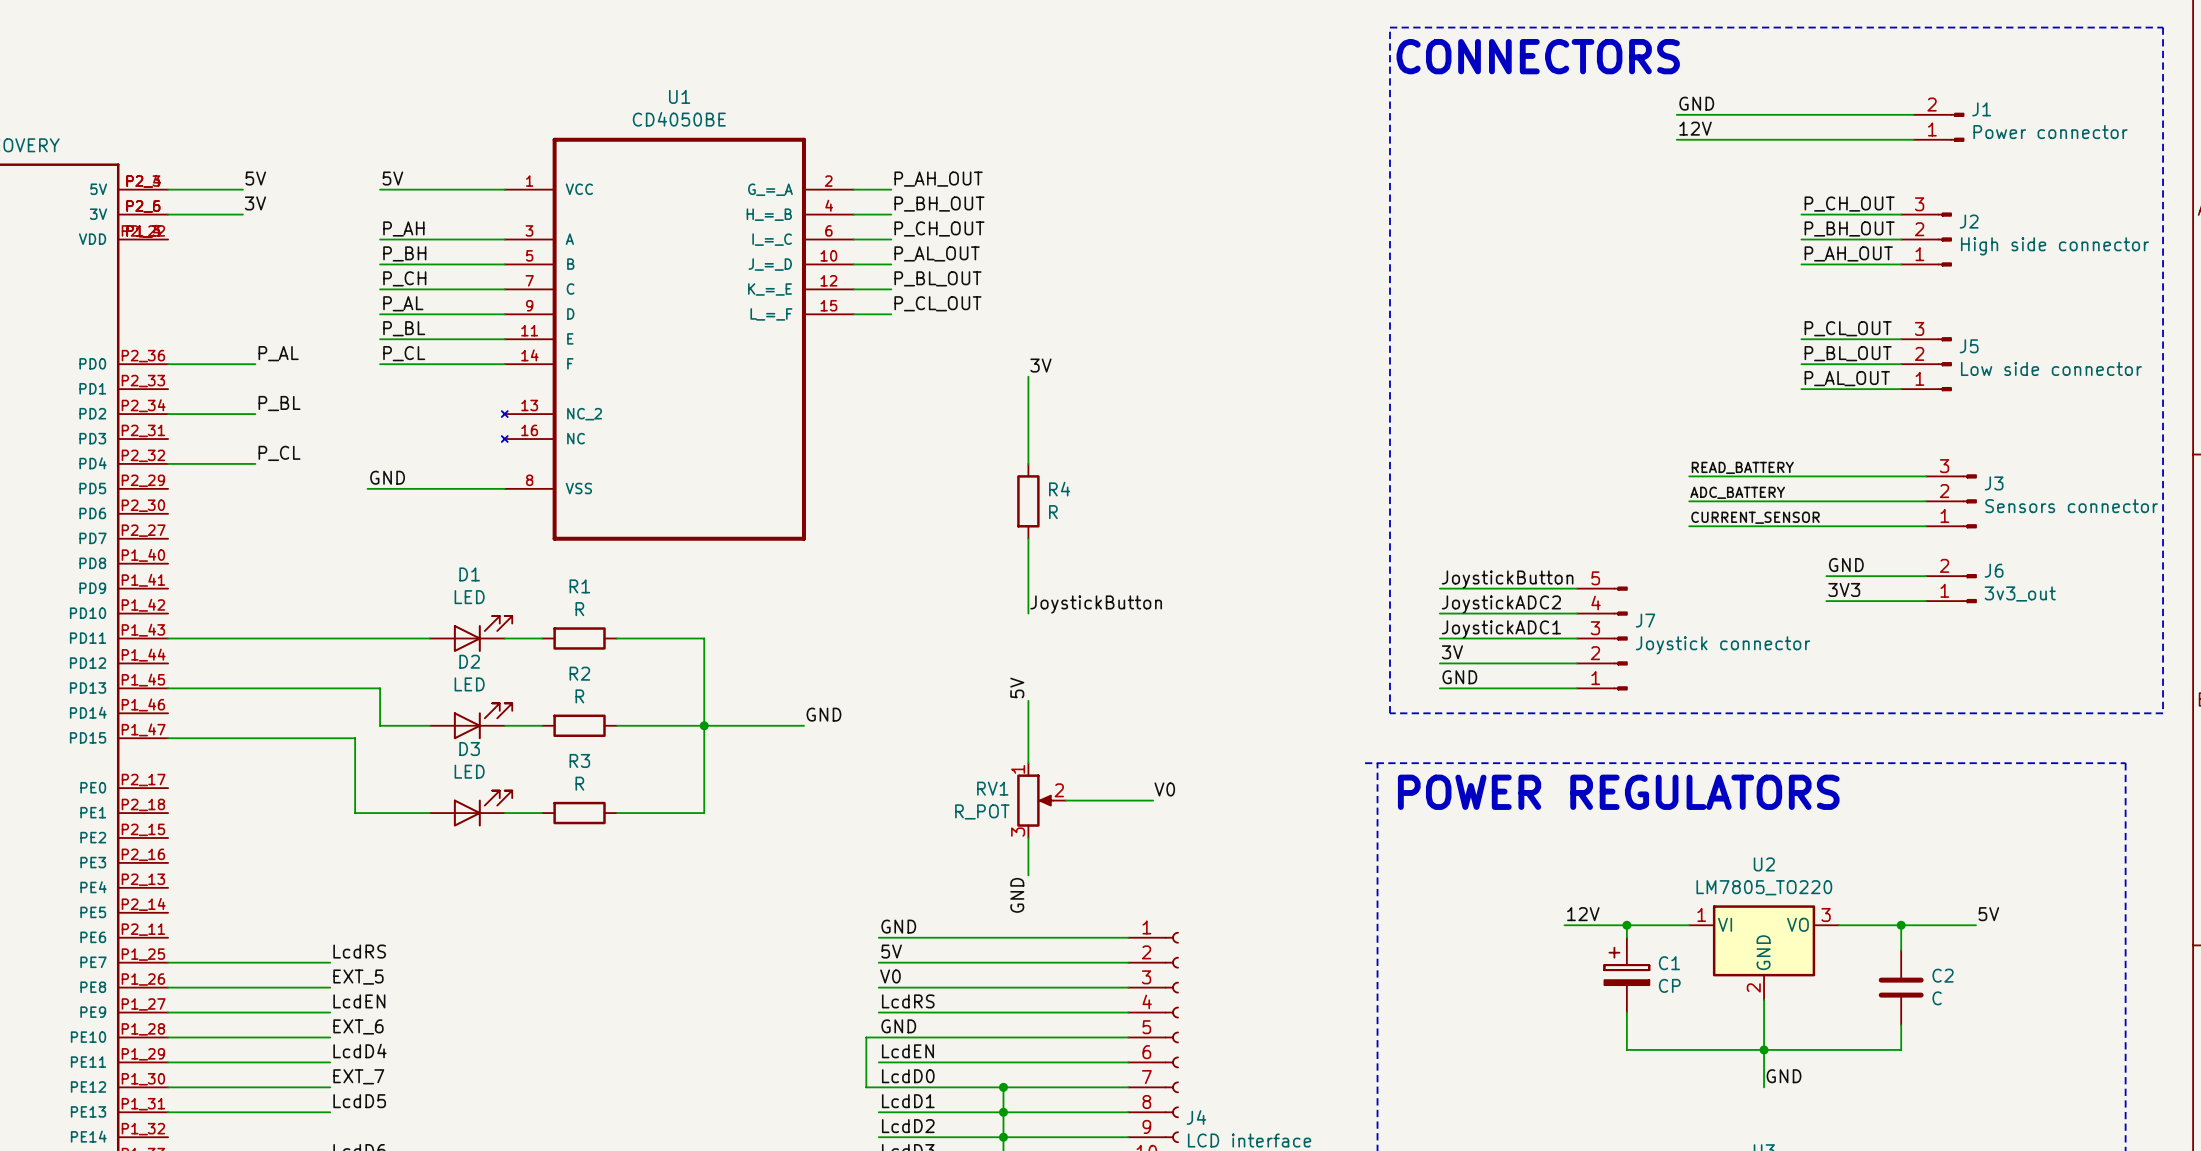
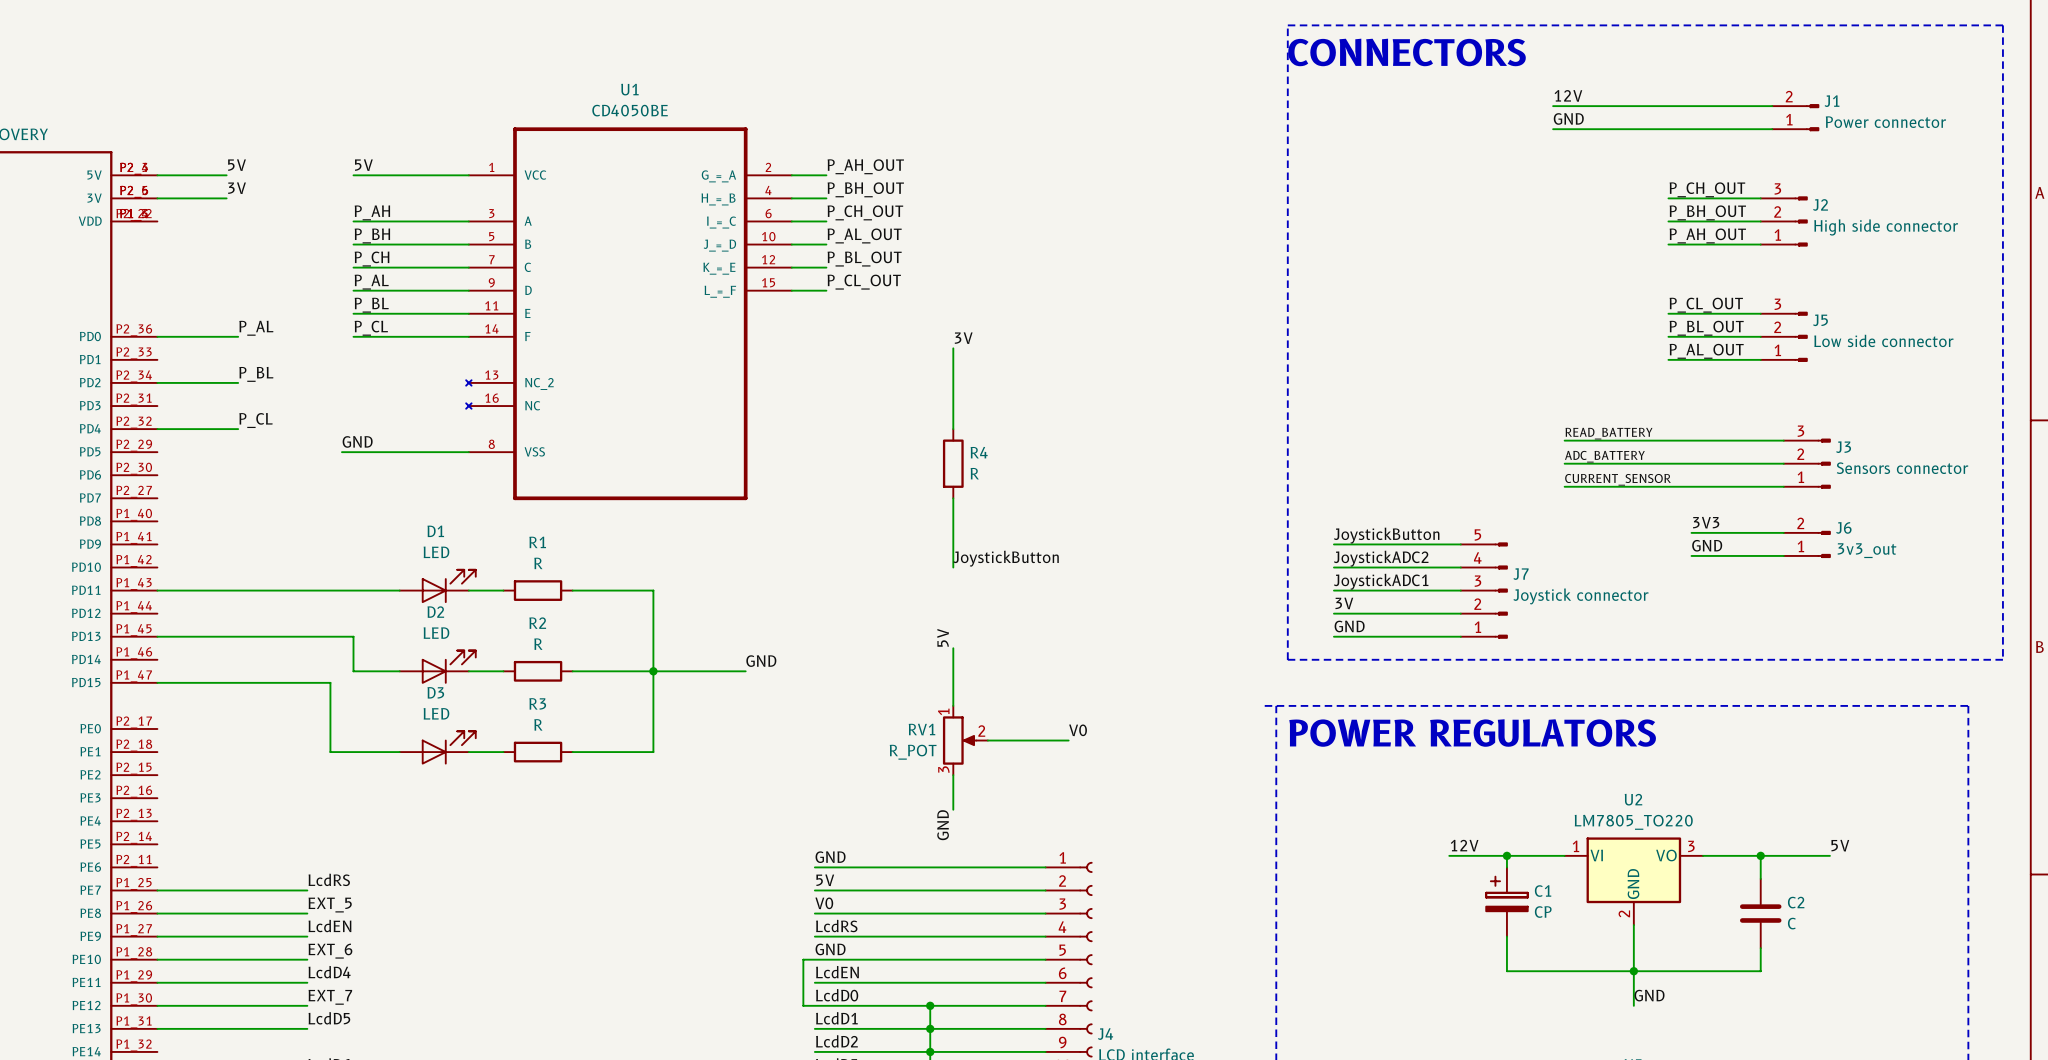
label: GND (1696, 103) -> 12V (1568, 95)
label: 12V (1695, 128) -> GND (1568, 118)
label: GND (1846, 565) -> 3V3 (1706, 522)
label: 3V3 (1844, 589) -> GND (1707, 545)

